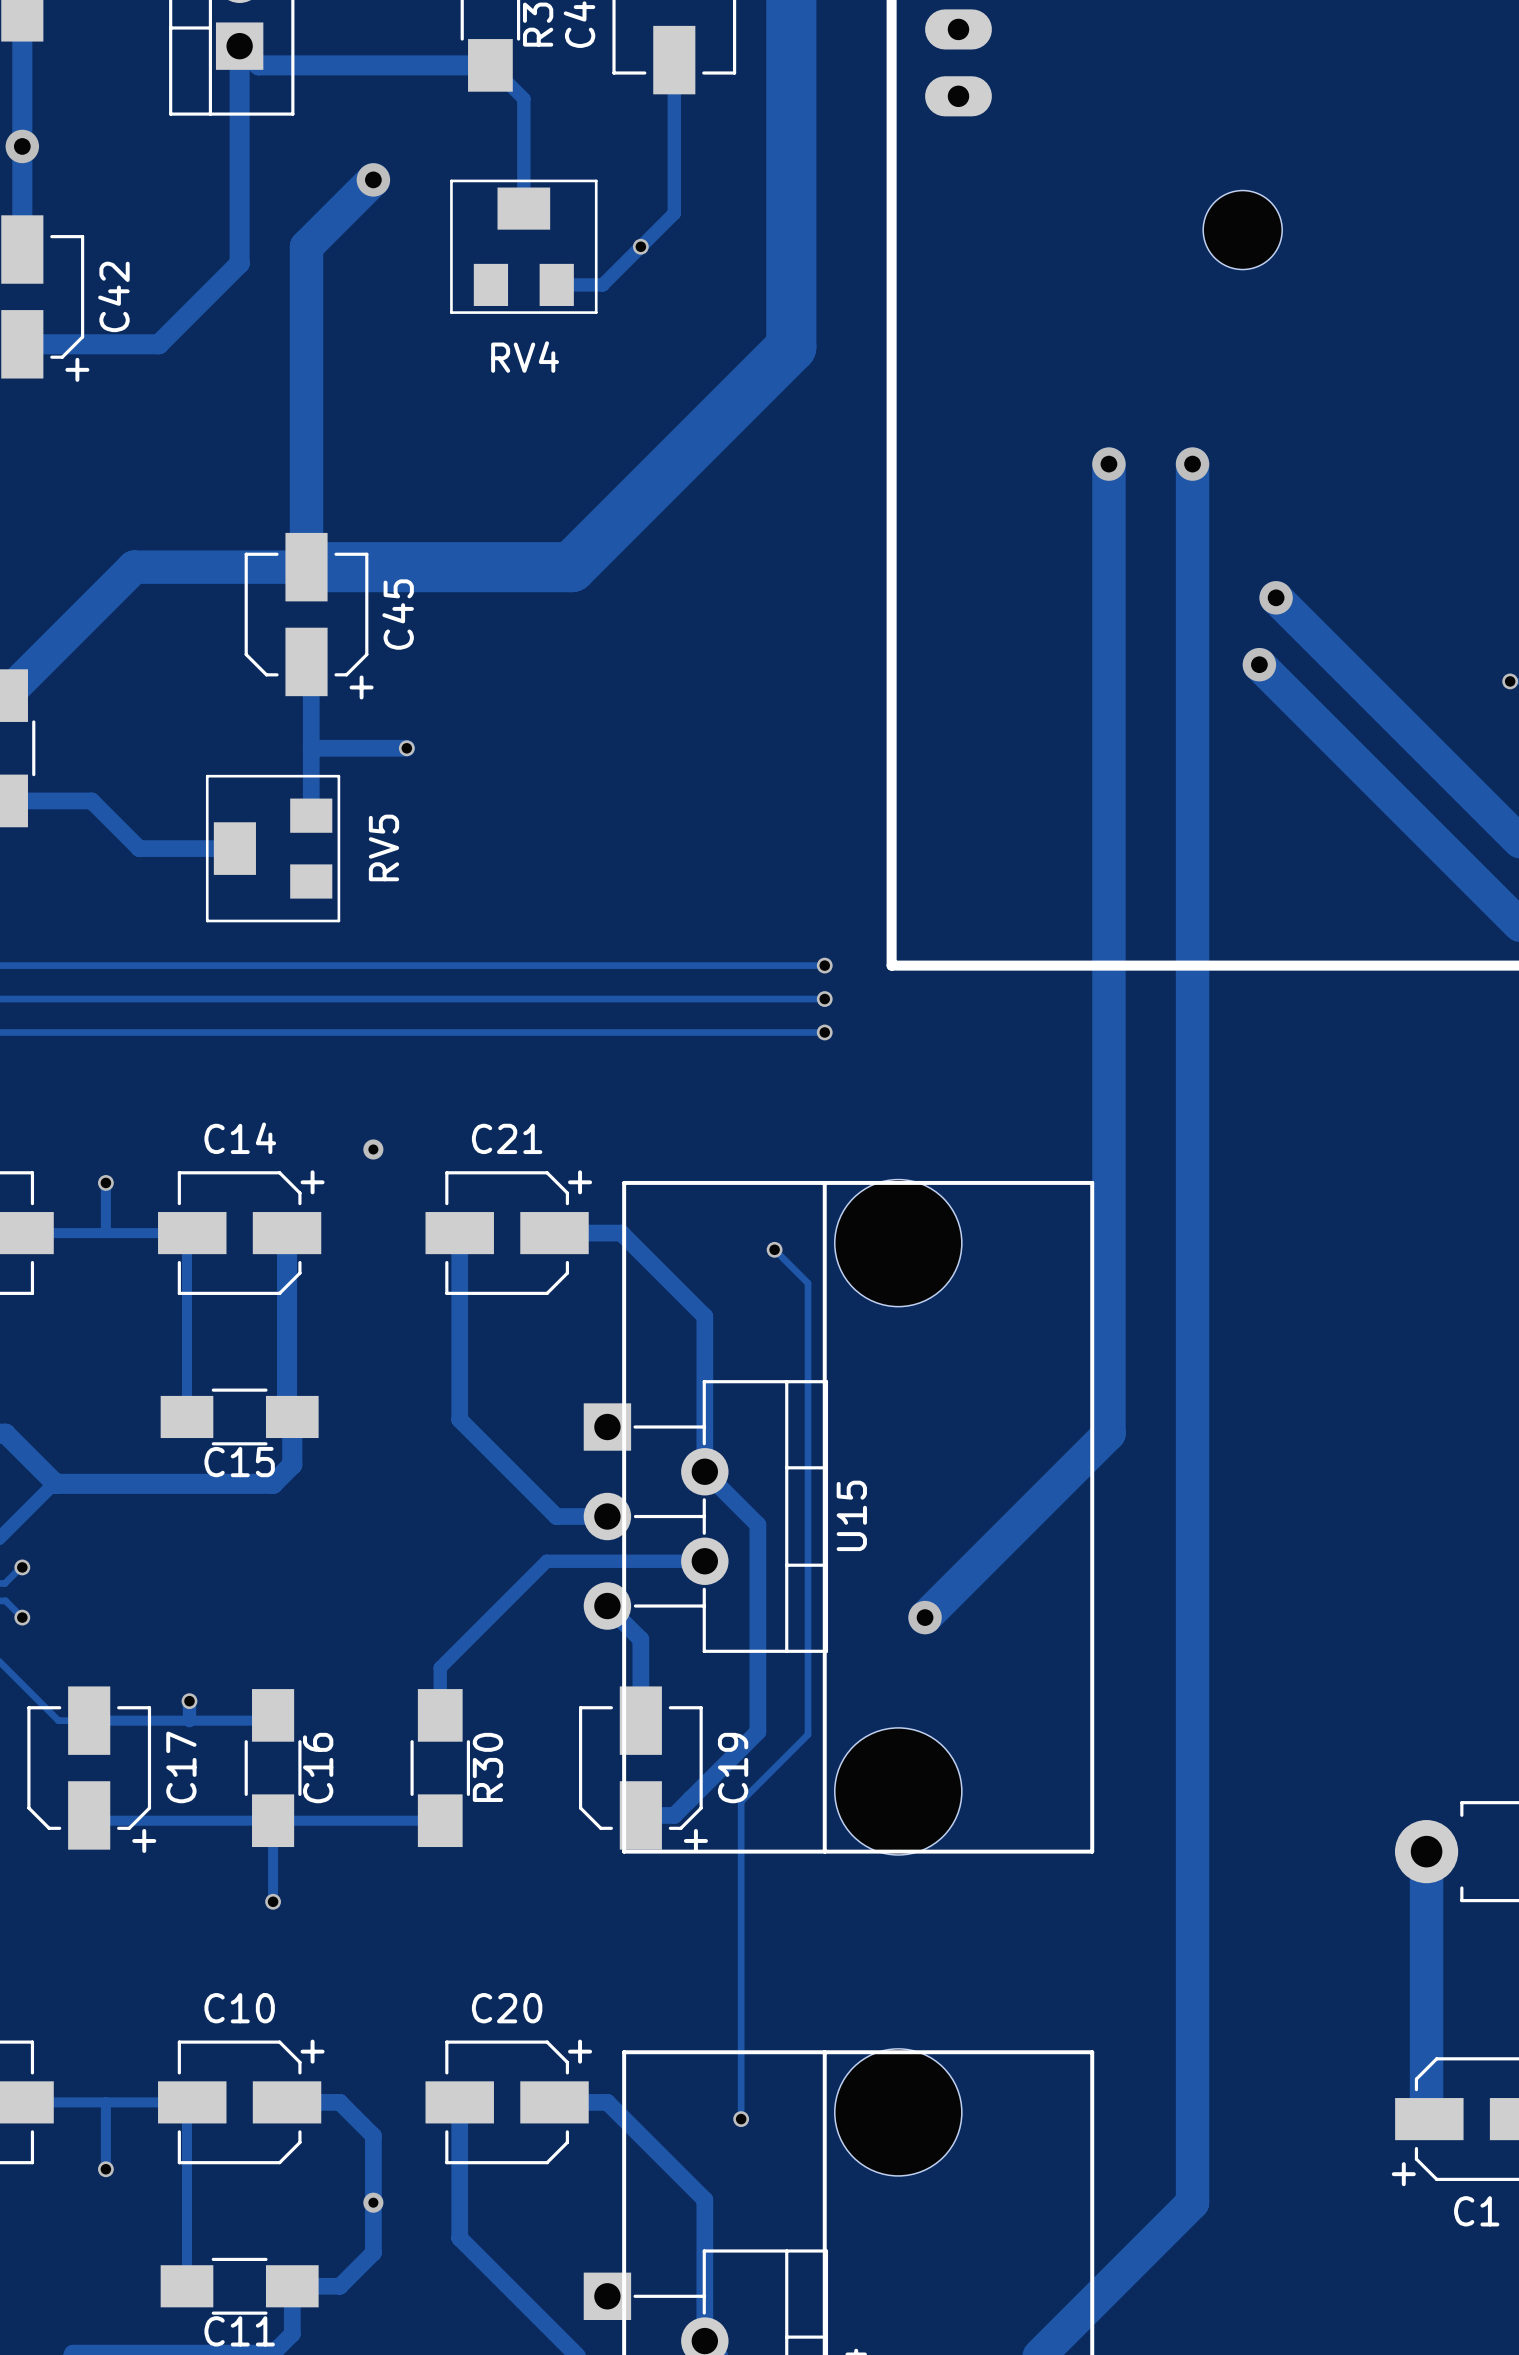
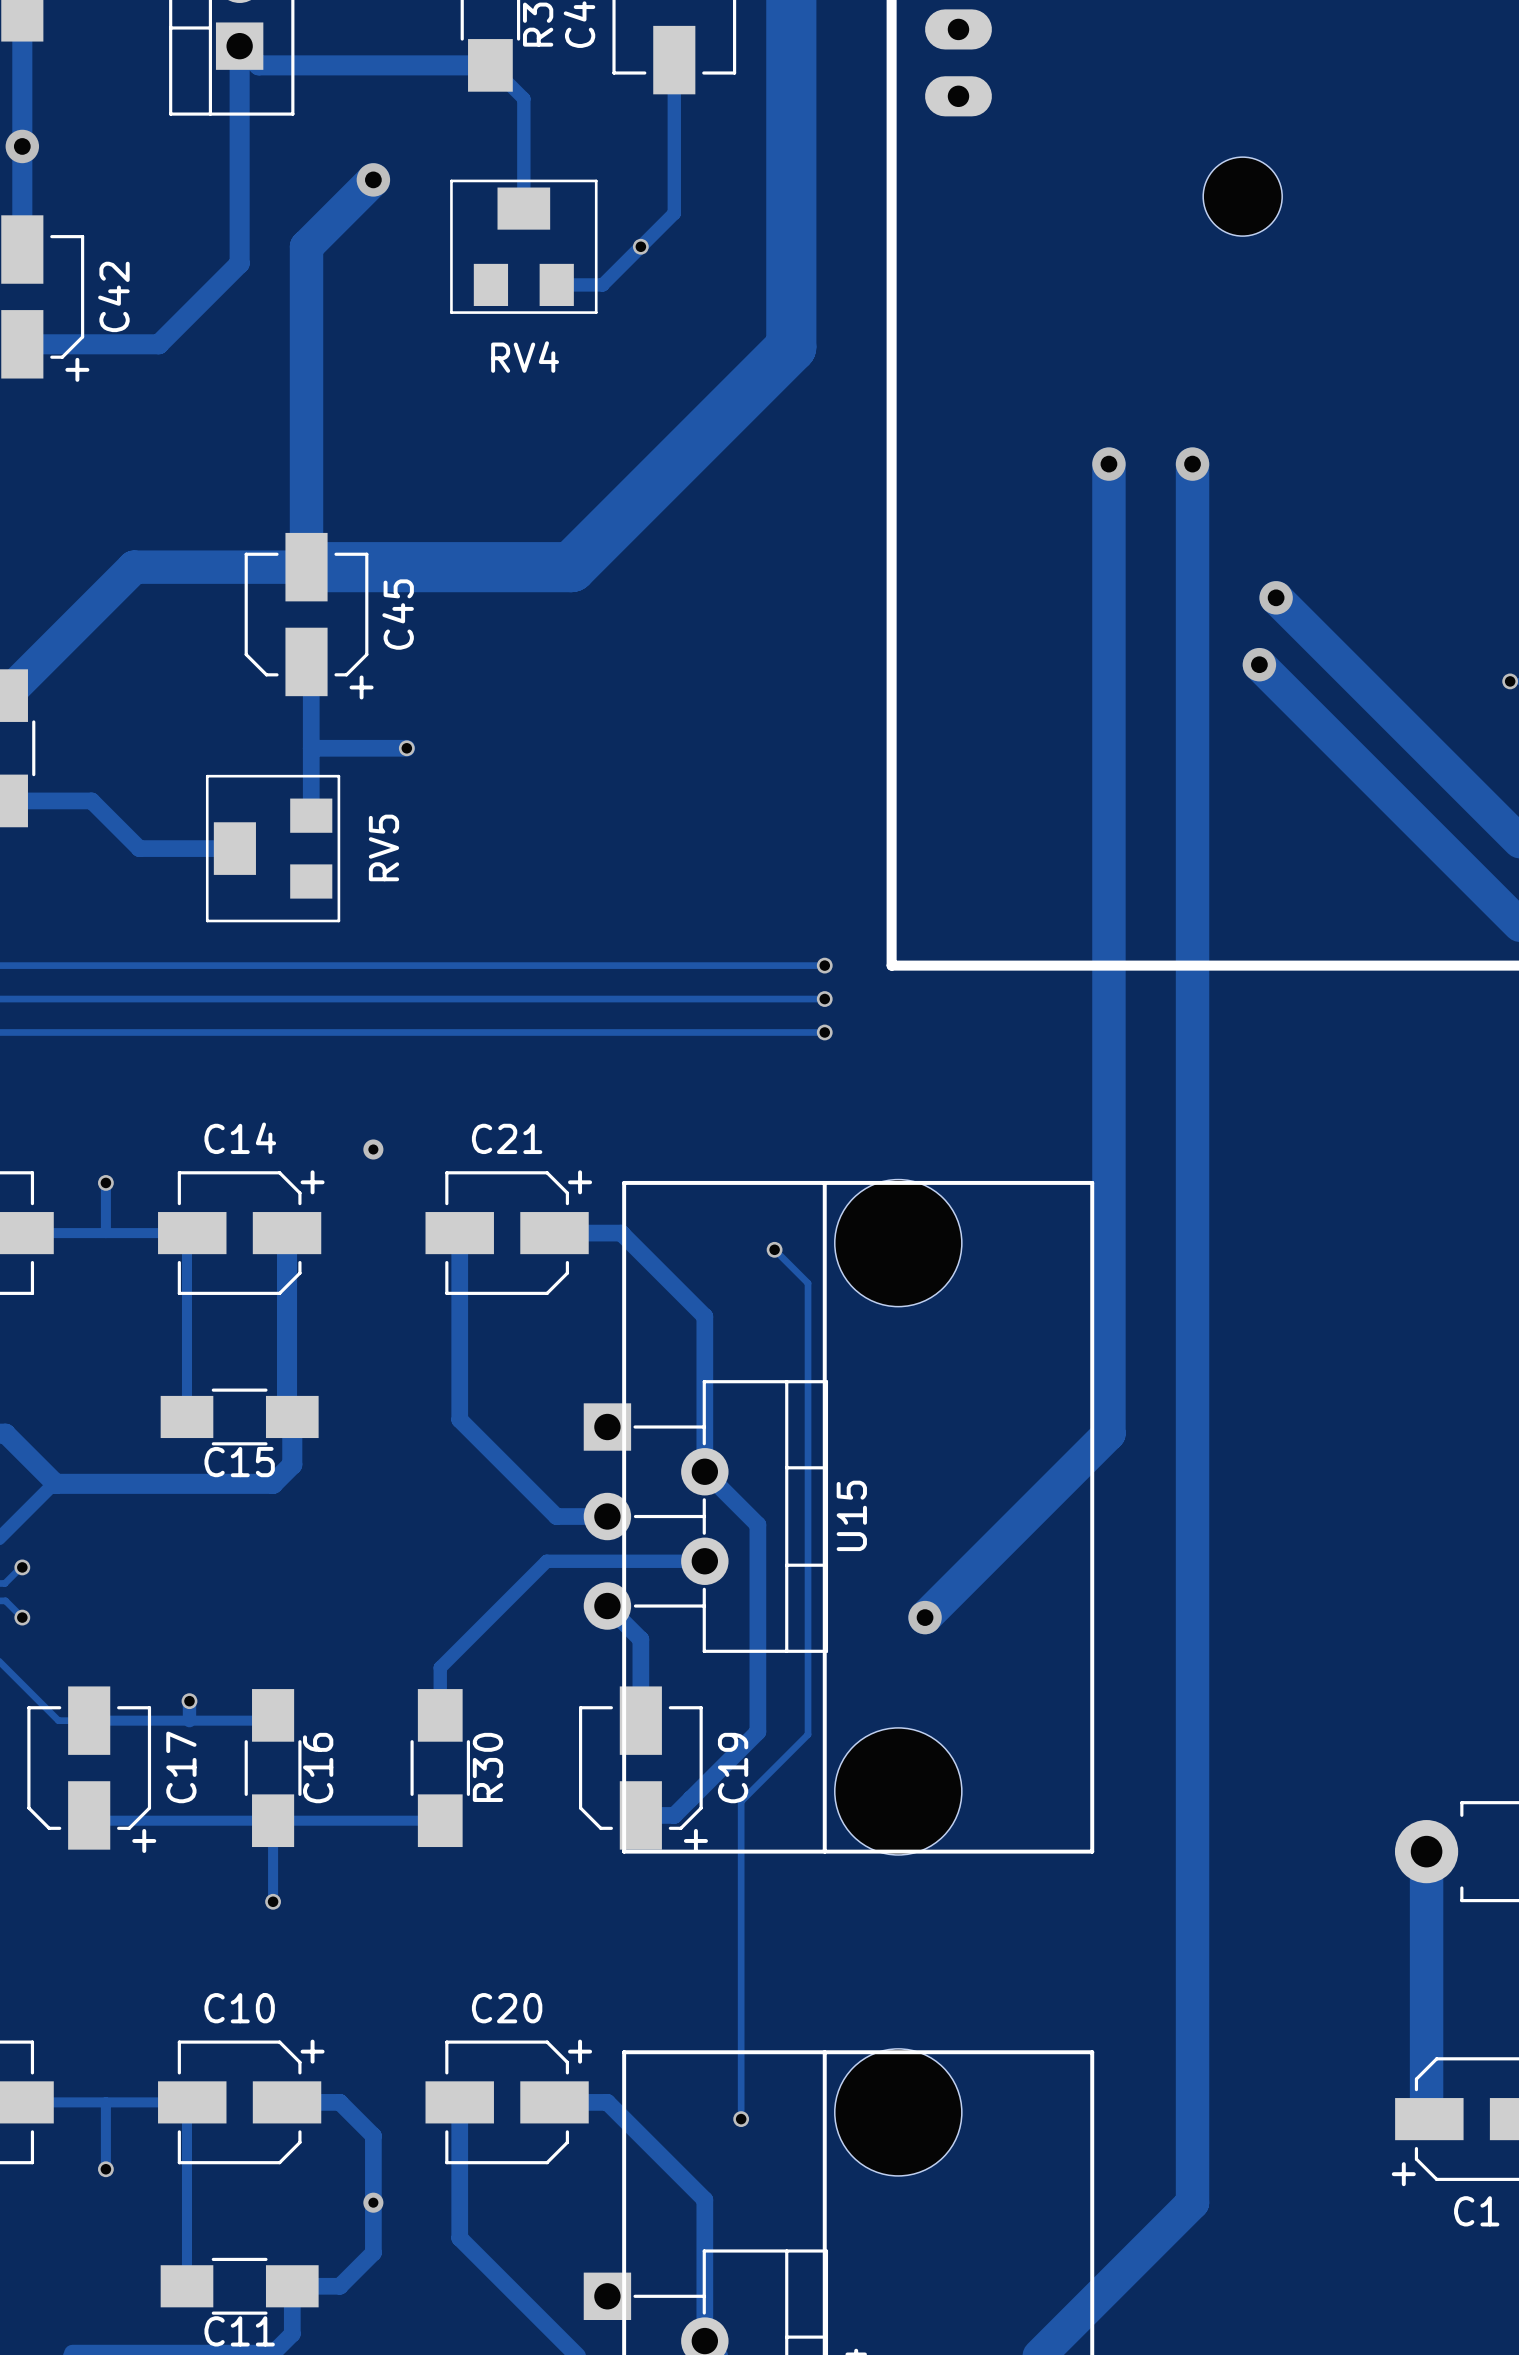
part position: (1242, 230) -> (1242, 196)

